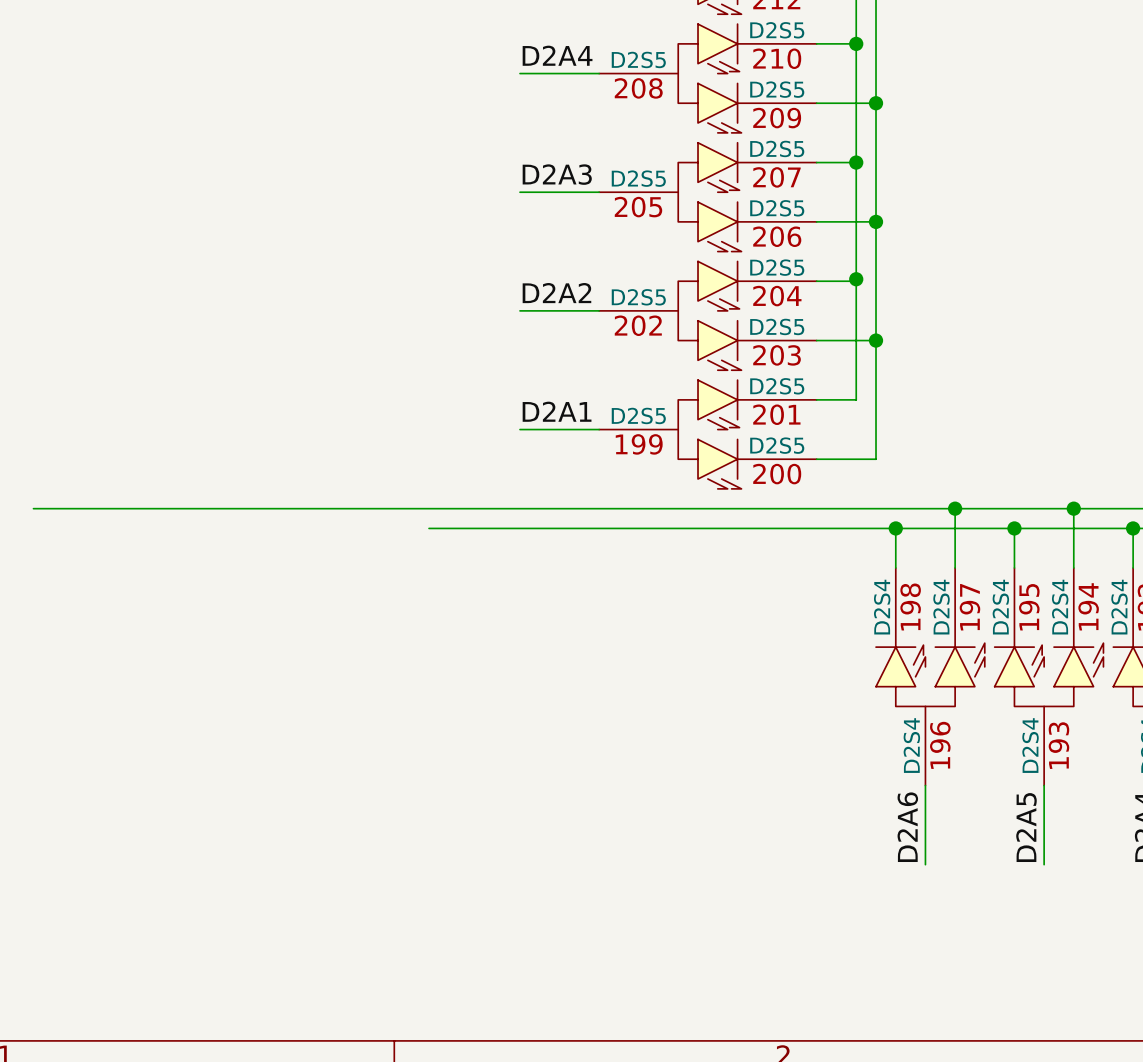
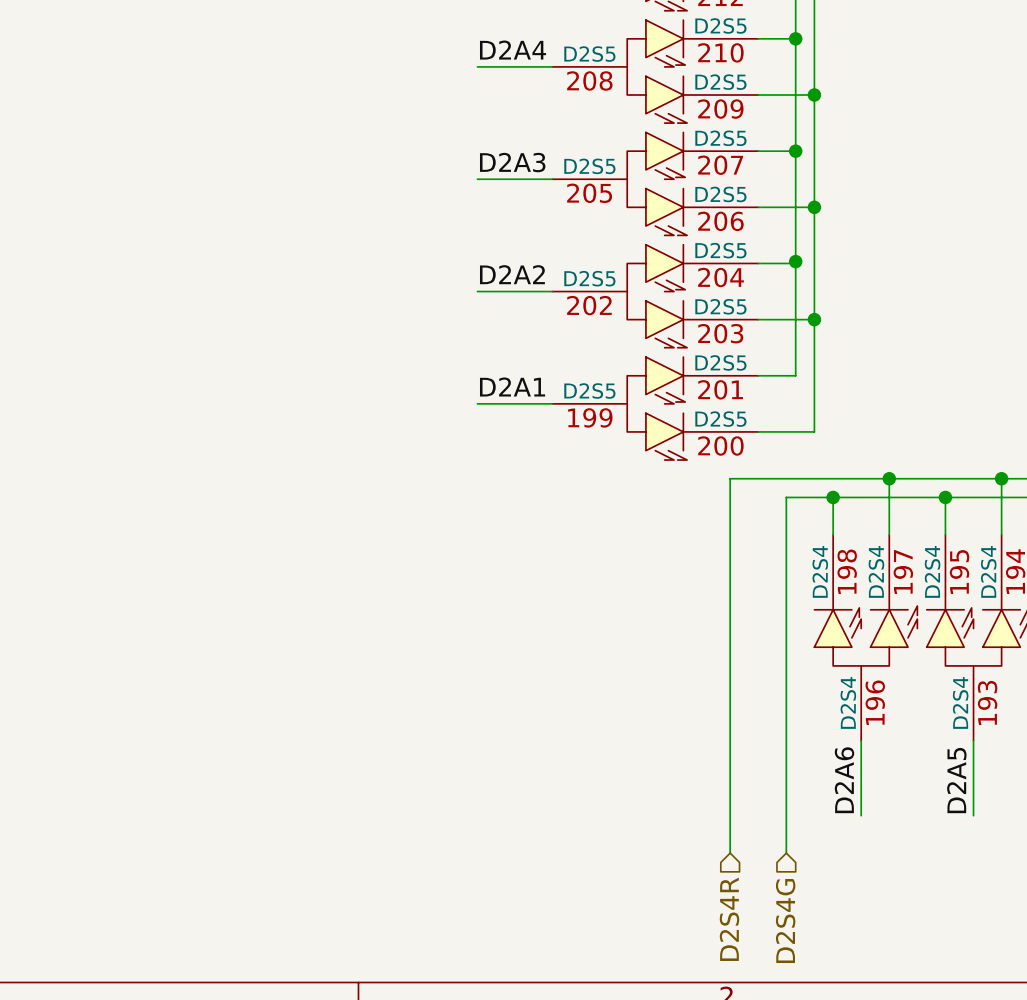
wire: (33, 508) (787, 508) -> (730, 853) (730, 478)
wire: (429, 528) (846, 528) -> (786, 853) (786, 497)
hierarchical label: none -> D2S4R (729, 919)
hierarchical label: none -> D2S4G (785, 921)

